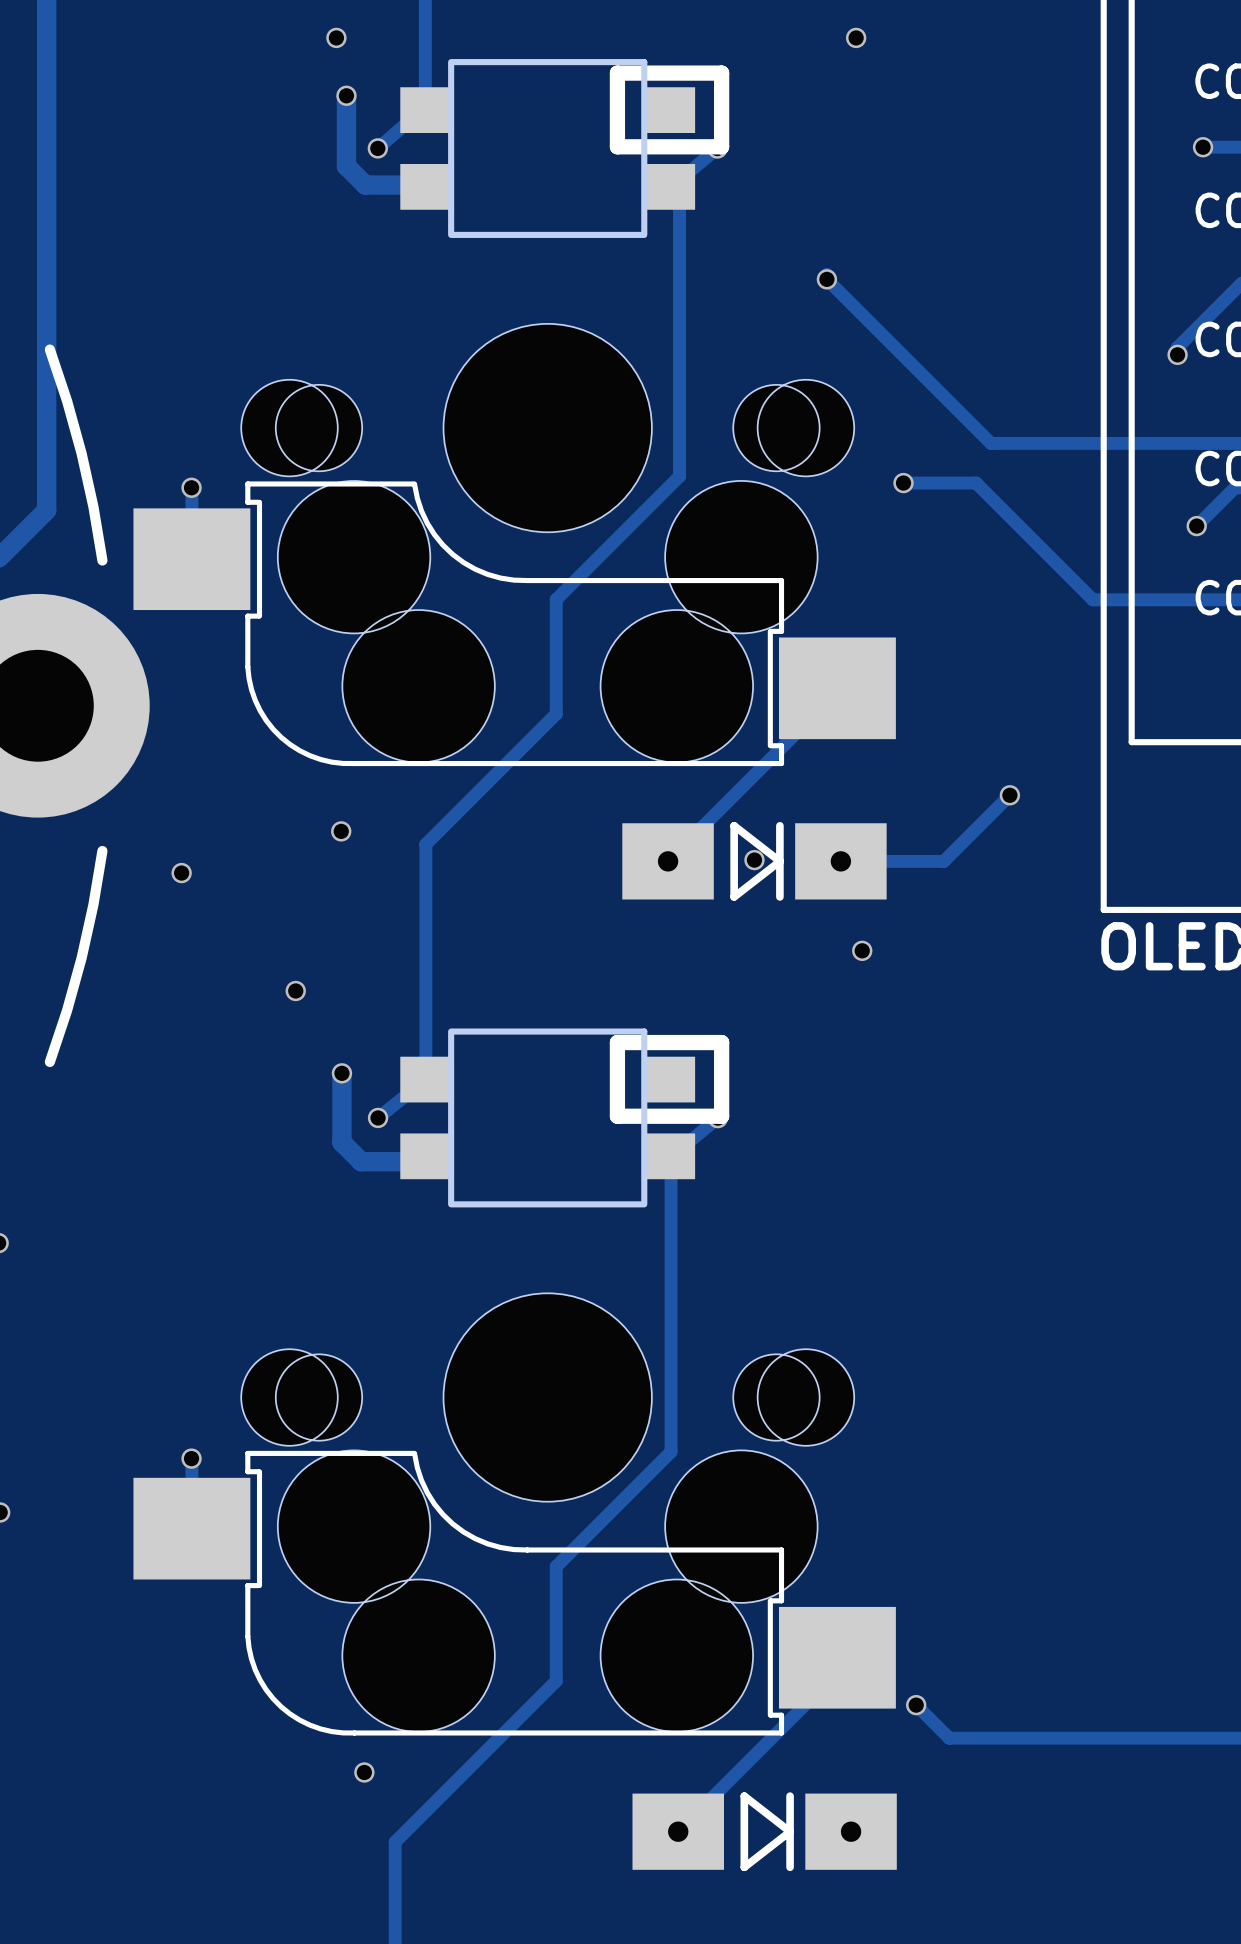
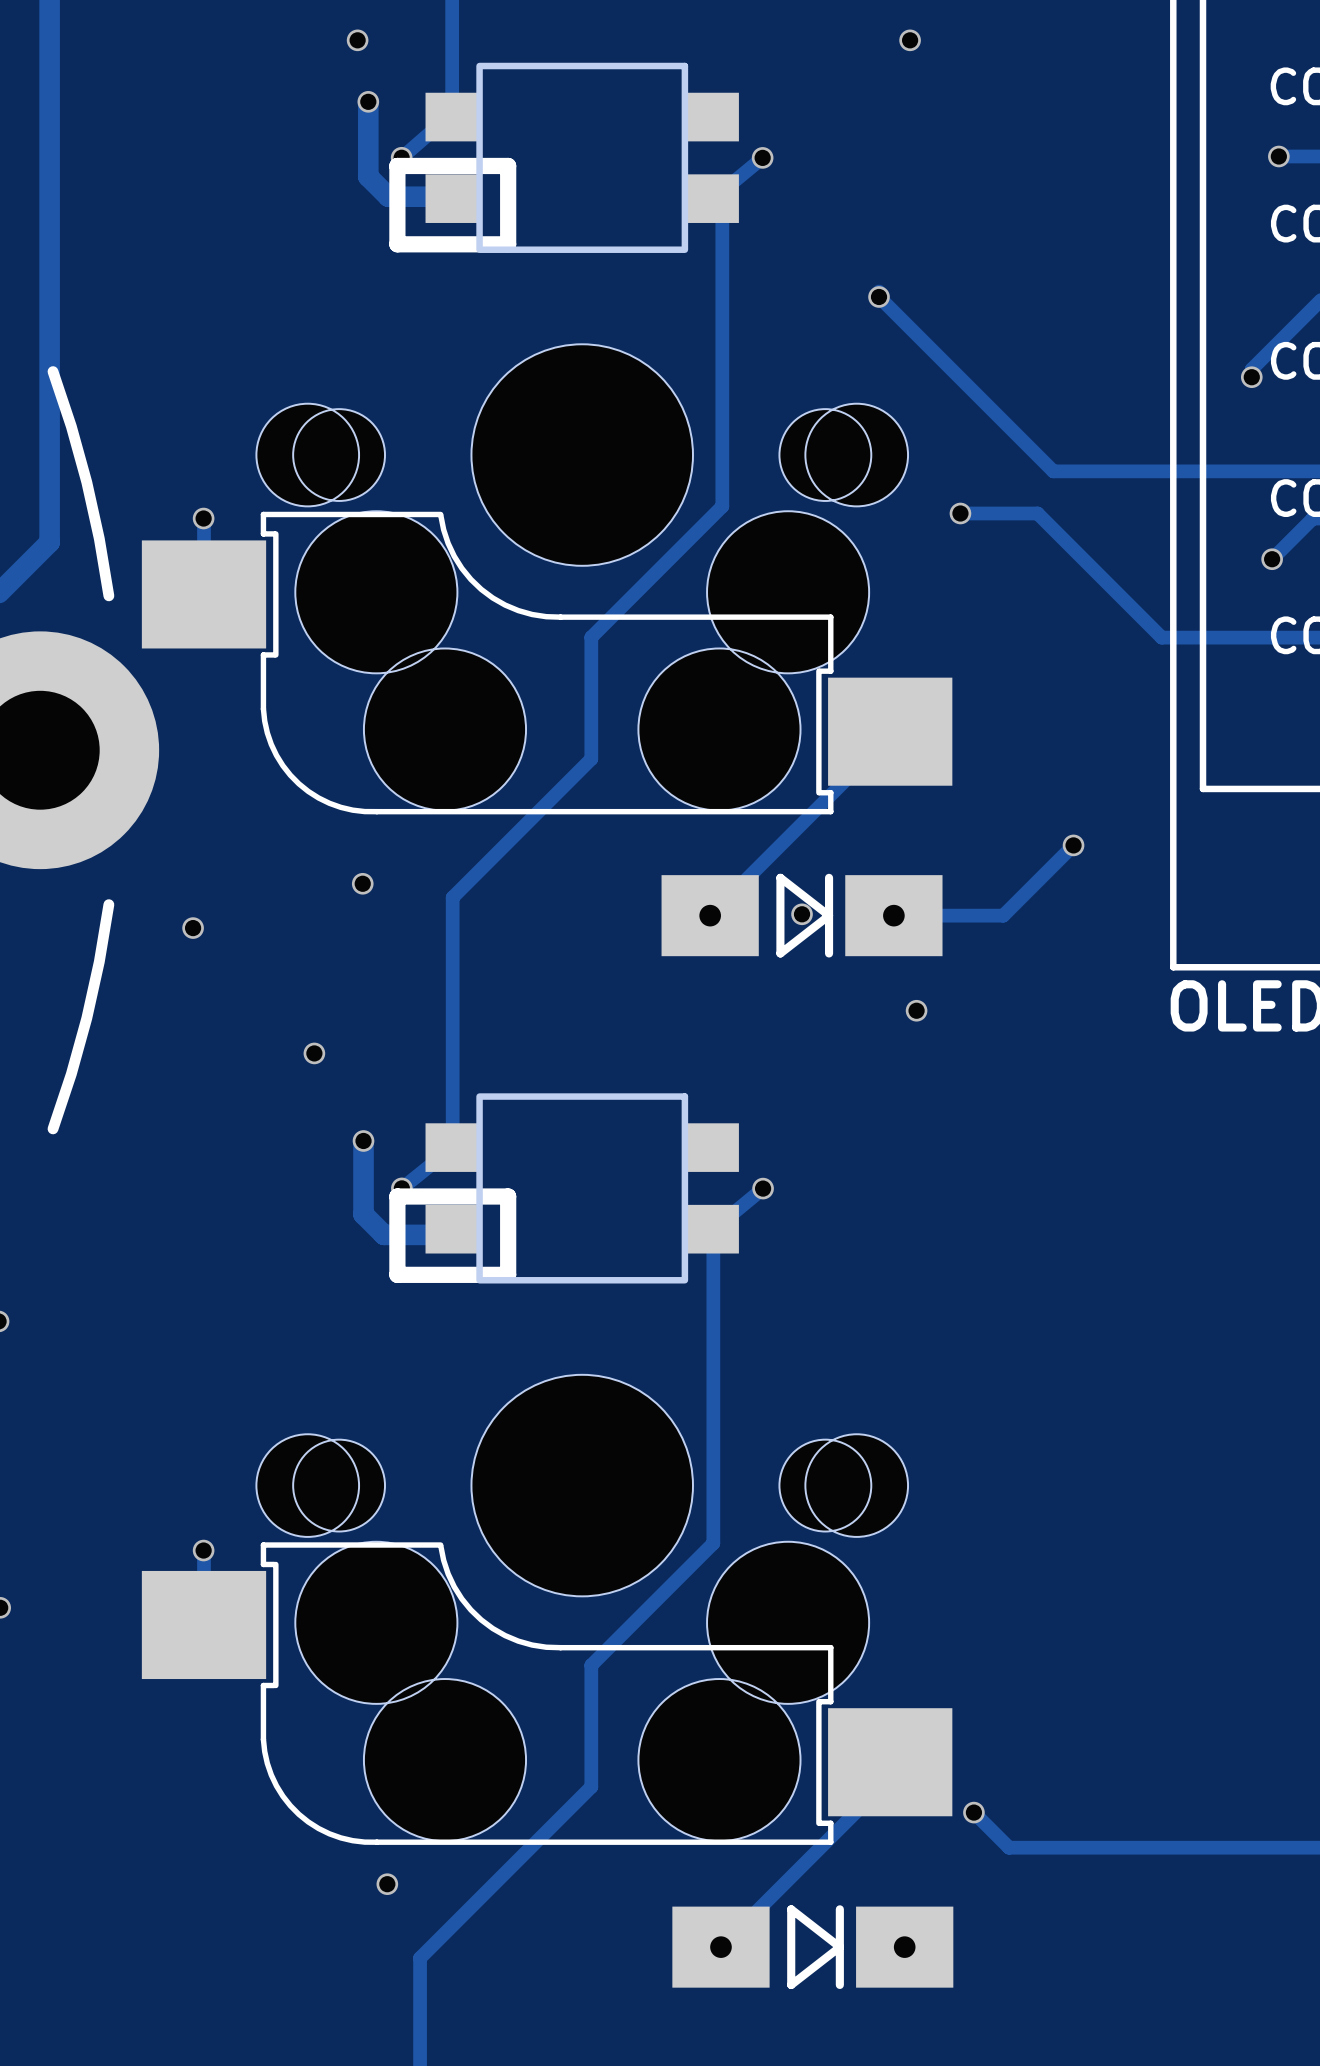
part footprint: [133, 59, 896, 767] -> [141, 62, 953, 815]
part footprint: [133, 1028, 896, 1736] -> [141, 1093, 953, 1845]

